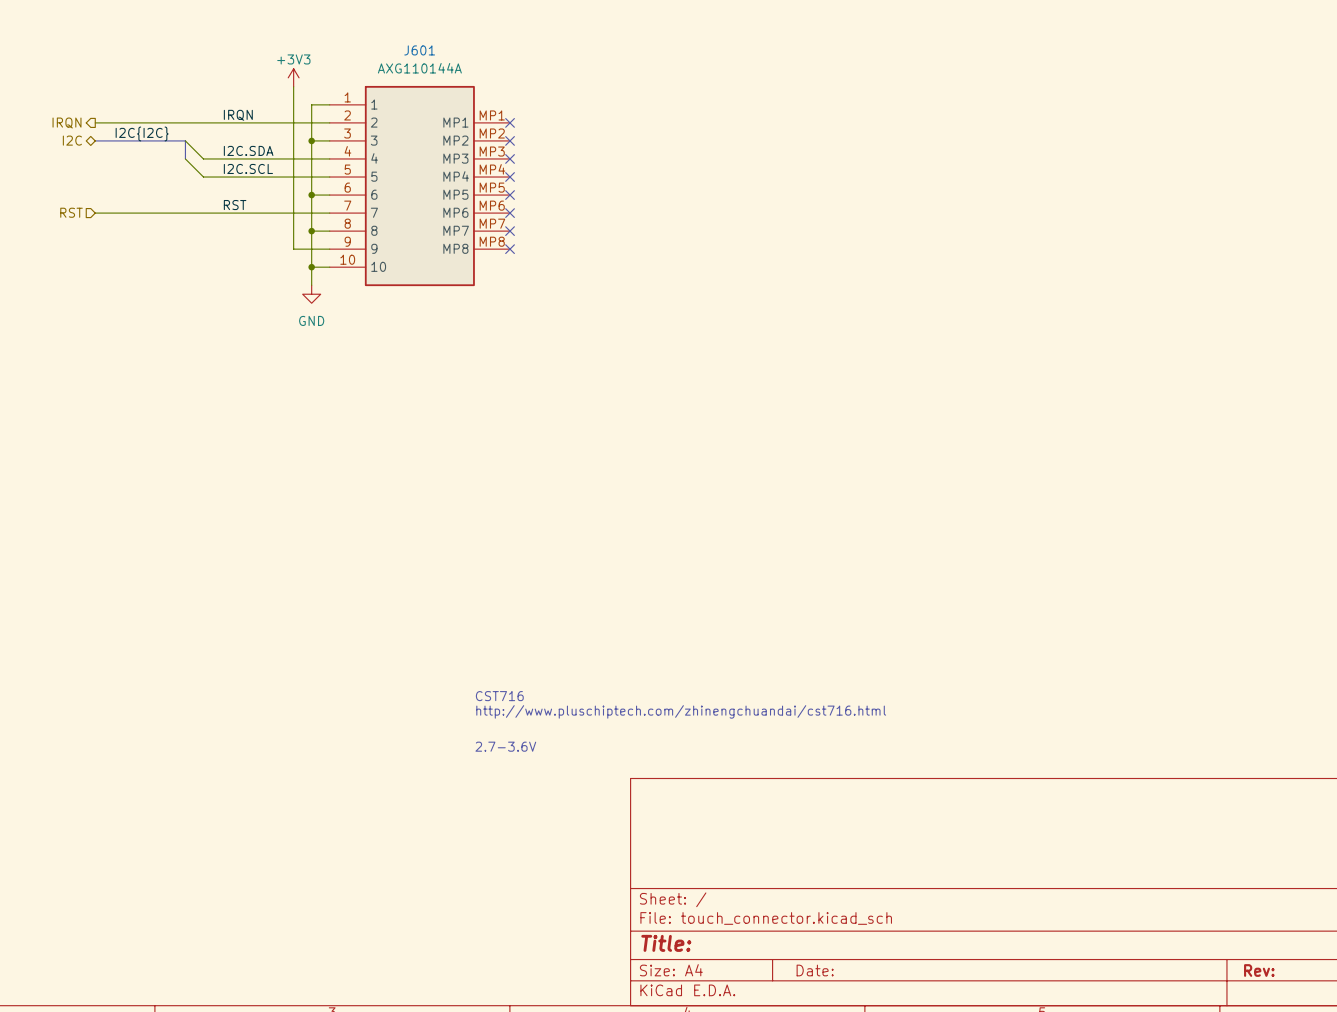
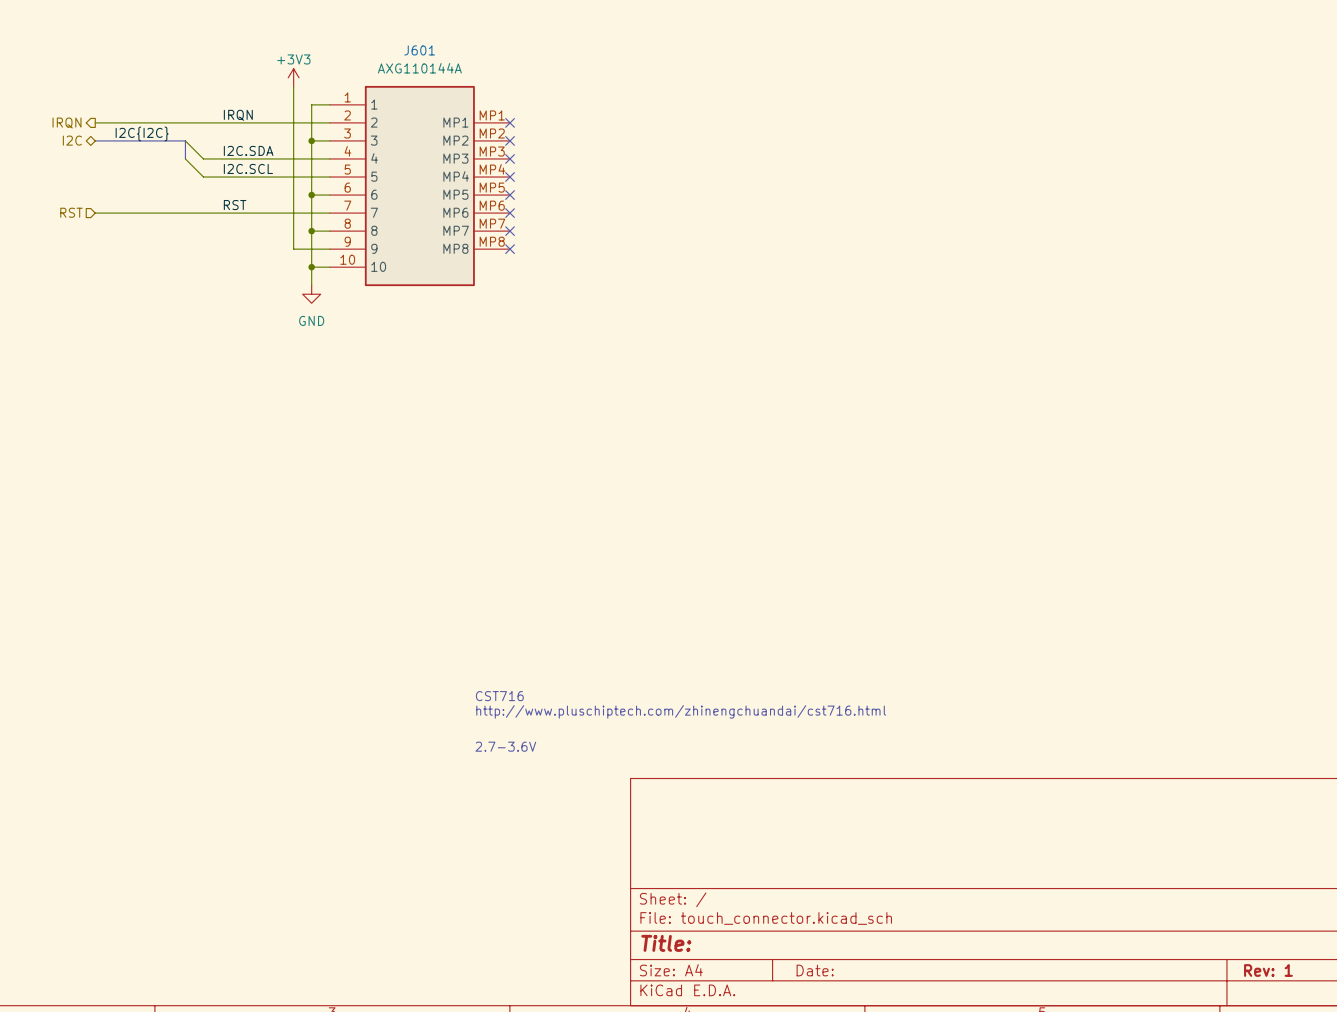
title block: Rev: (1259, 970) -> Rev: 1 (1268, 970)

